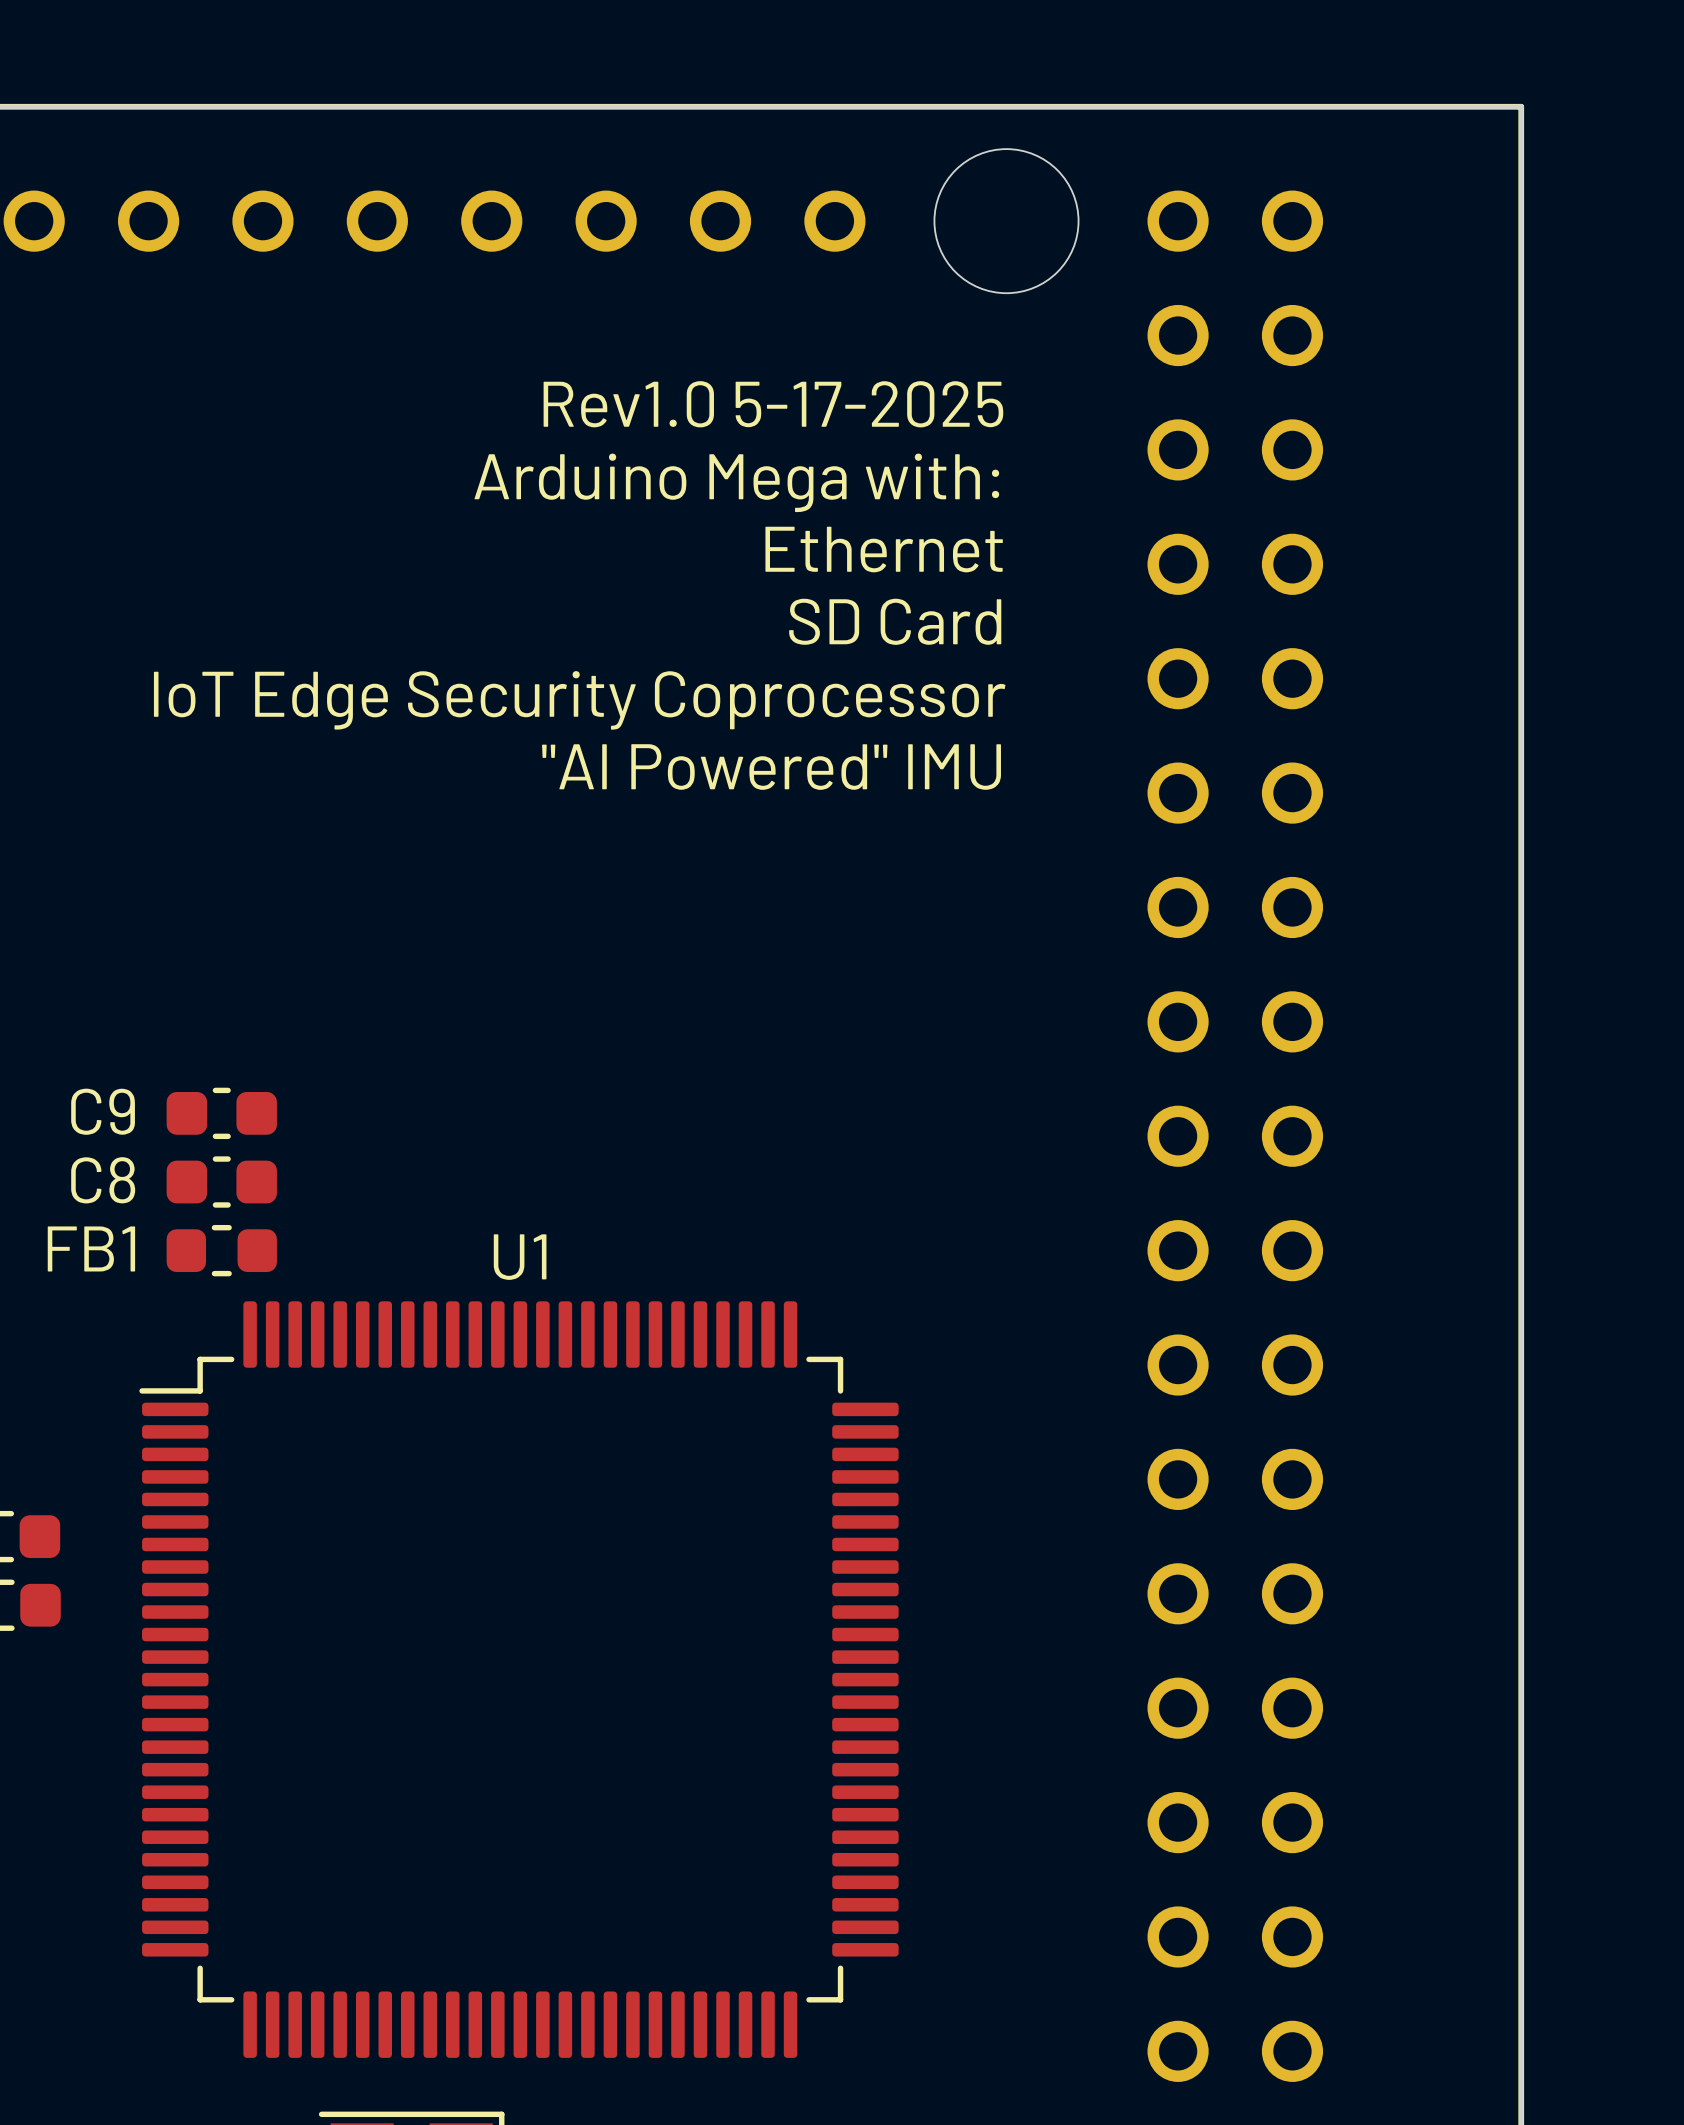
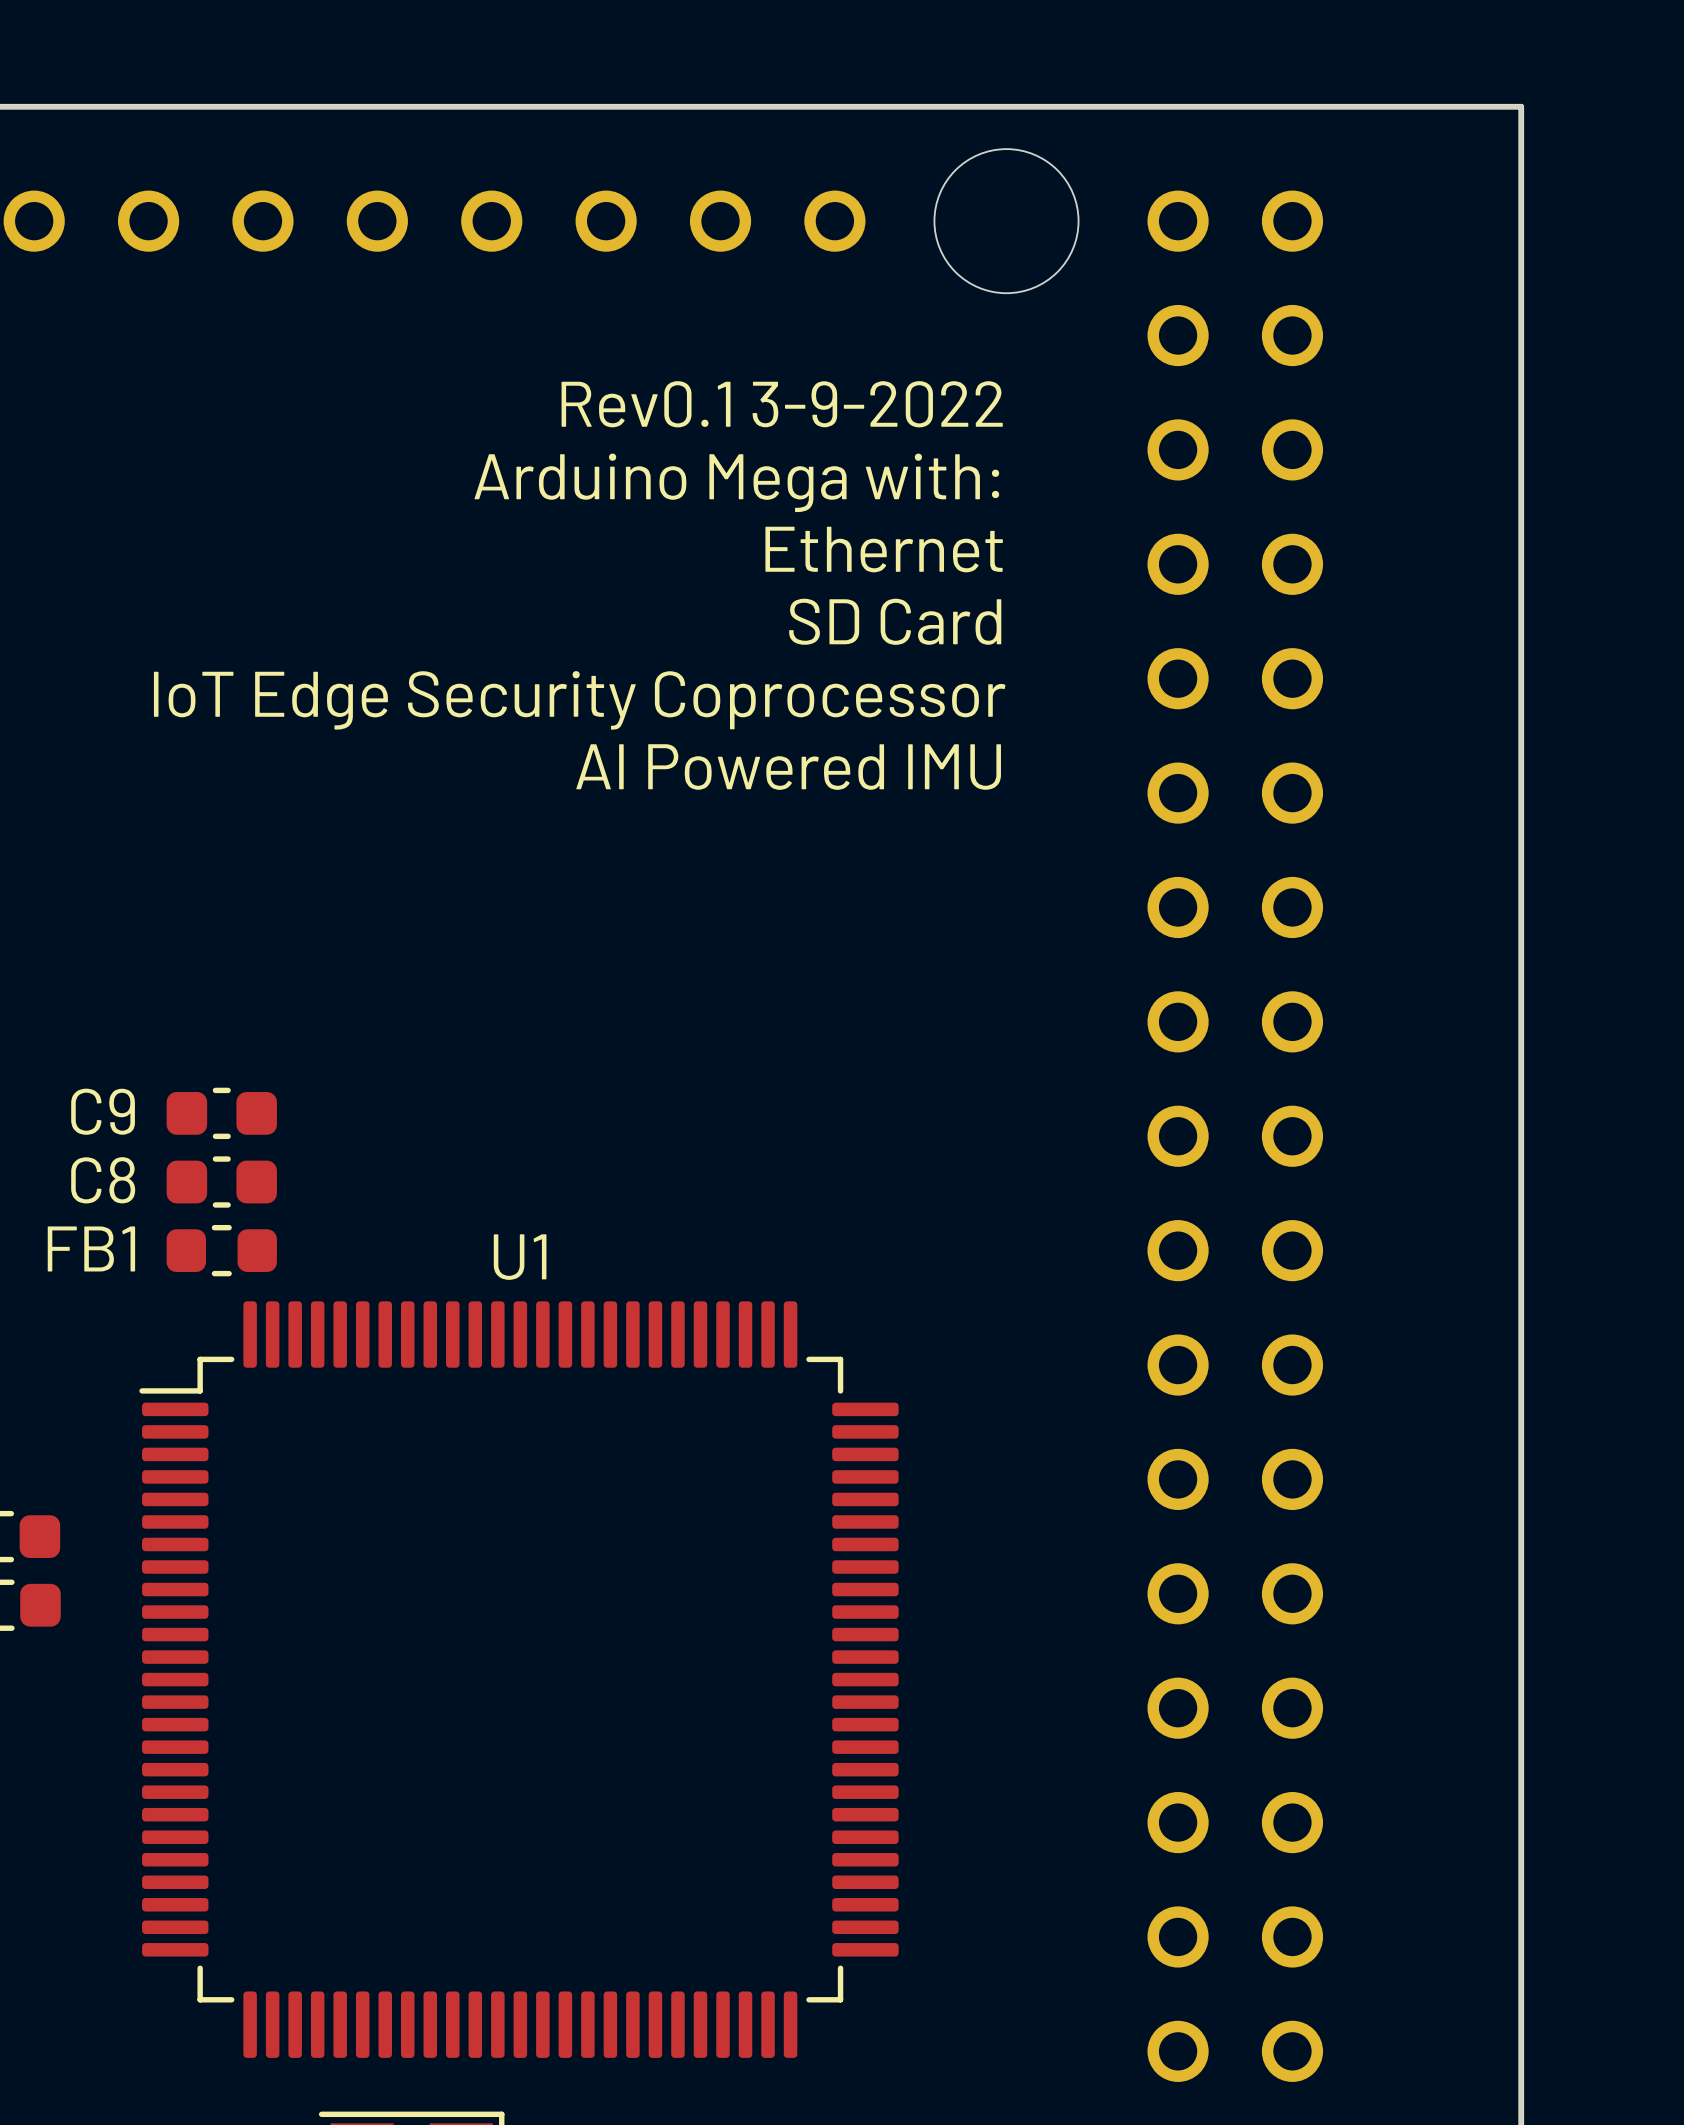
text: Rev1.0 5-17-2025 (773, 404) -> Rev0.1 3-9-2022 (782, 404)
text: "AI Powered" IMU (771, 767) -> AI Powered IMU (788, 767)

